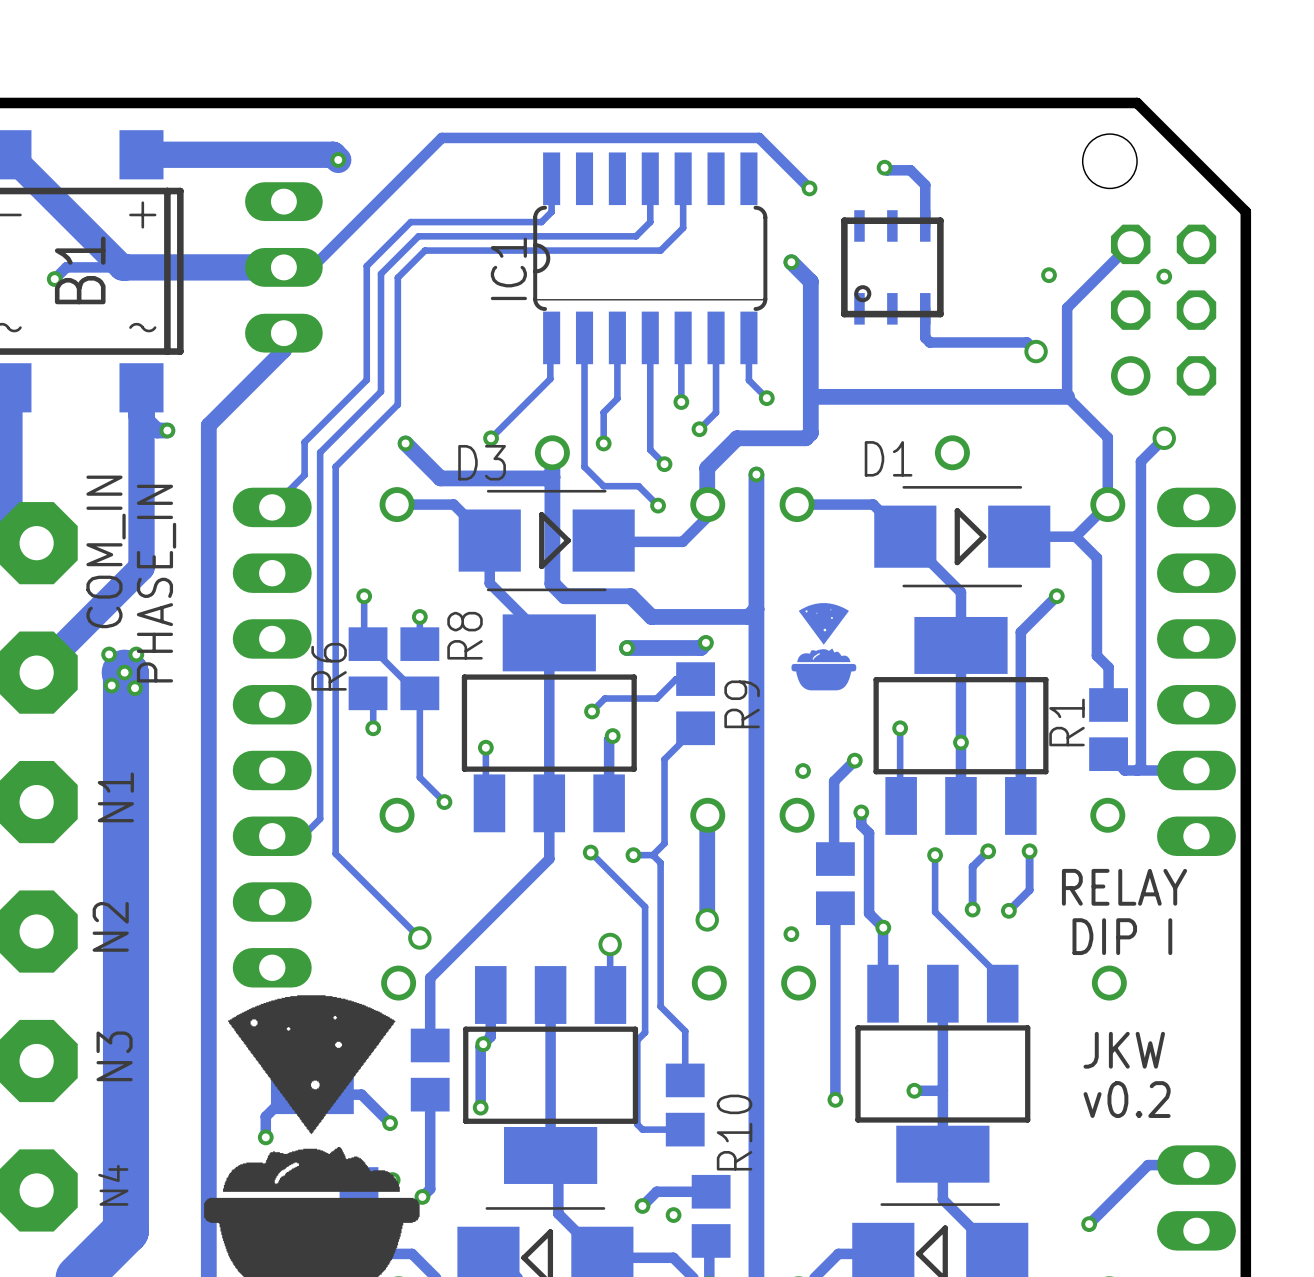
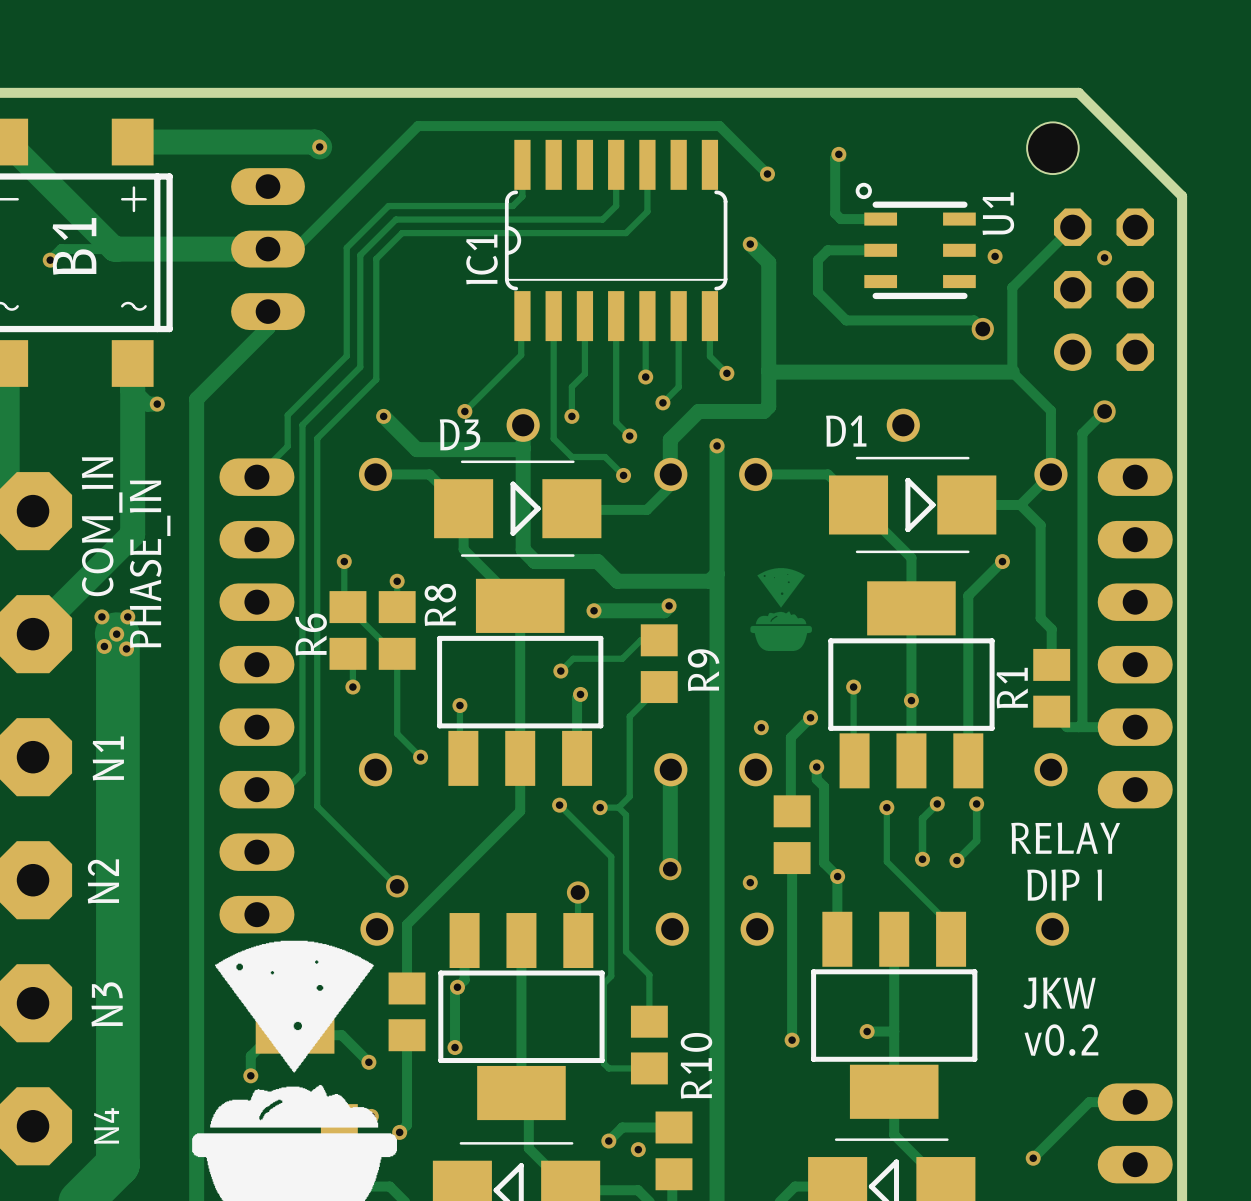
track: none -> (838, 154) (835, 158) (835, 213) (840, 219) (880, 219)
track: (887, 170) (910, 170) (925, 185) (925, 225) -> none
U1: none -> (915, 240)
part: (892, 267) -> none
track: (925, 308) (925, 337) (929, 342) -> (880, 250) (827, 250) (817, 260) (817, 292) (846, 320) (881, 320)

